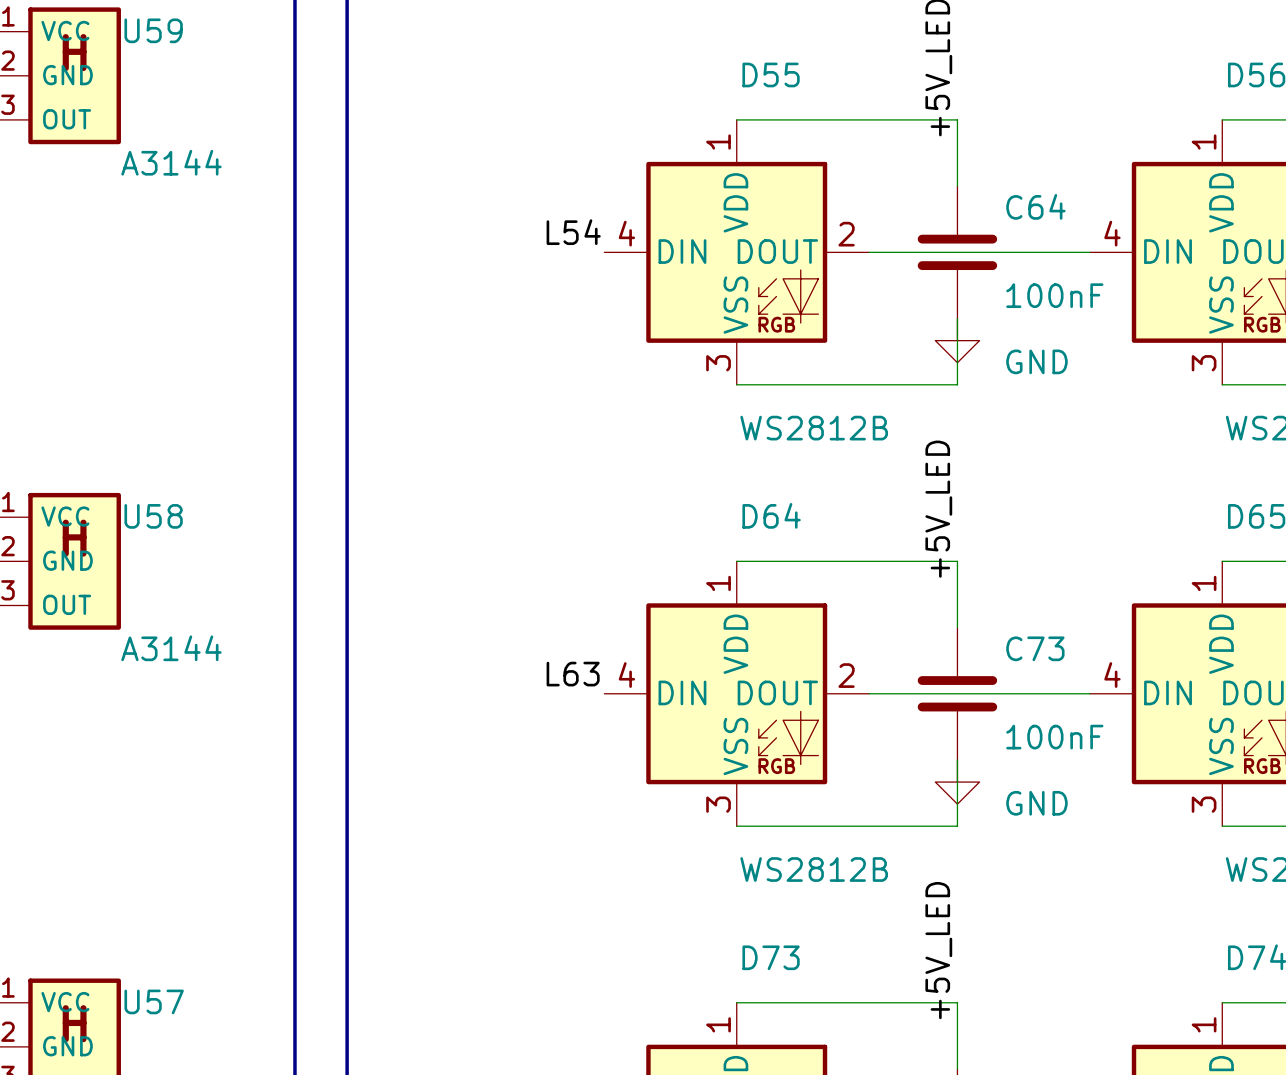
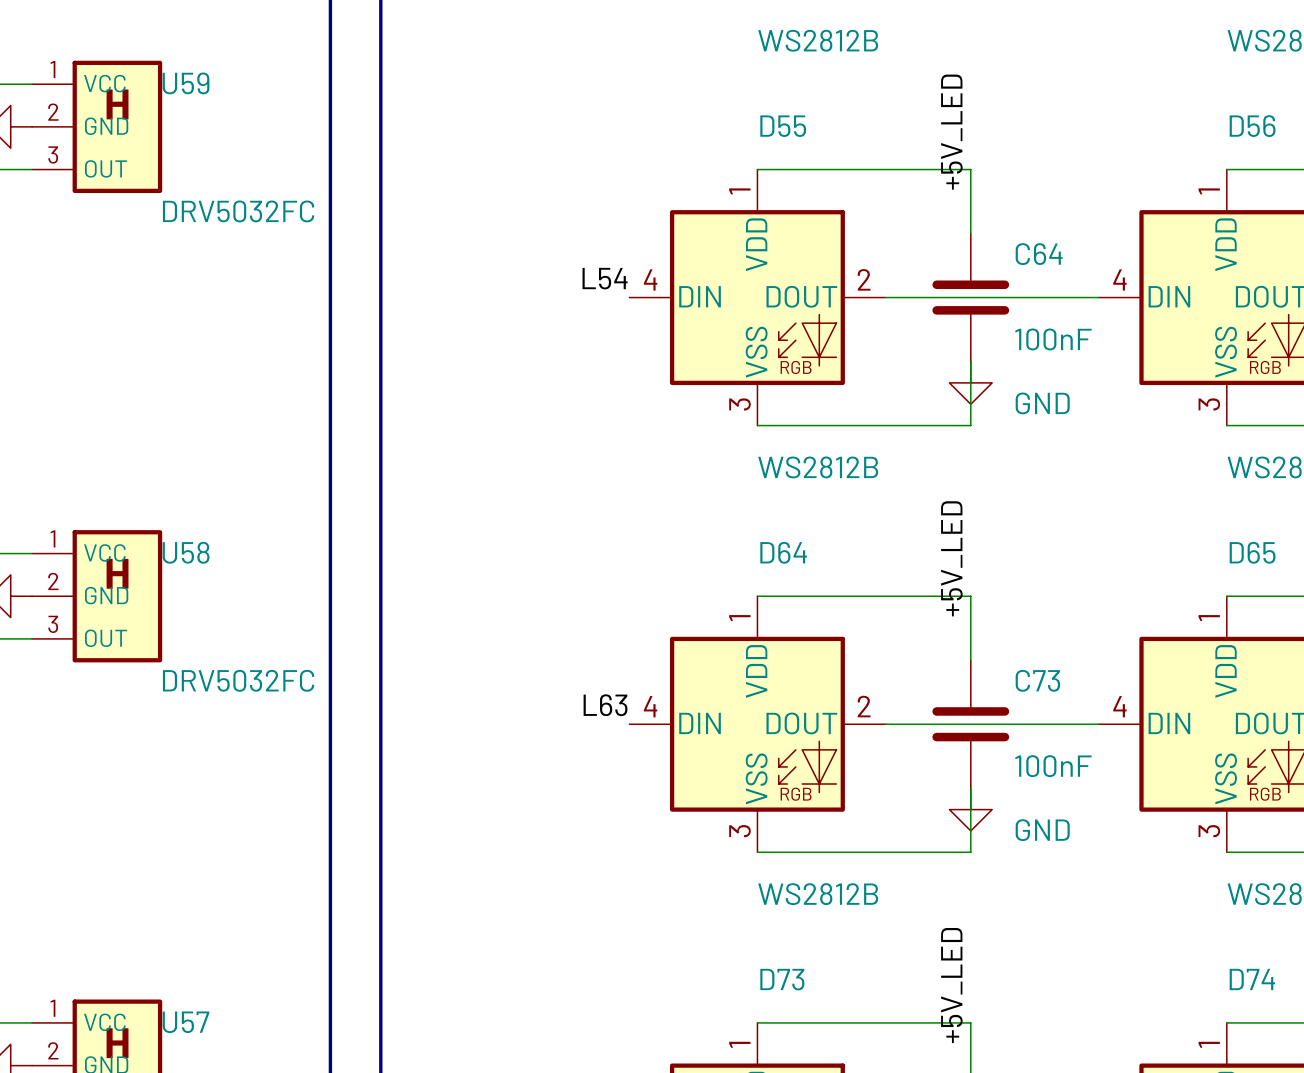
U59 value: A3144 (171, 162) -> DRV5032FC (238, 211)
U58 value: A3144 (171, 648) -> DRV5032FC (238, 680)

